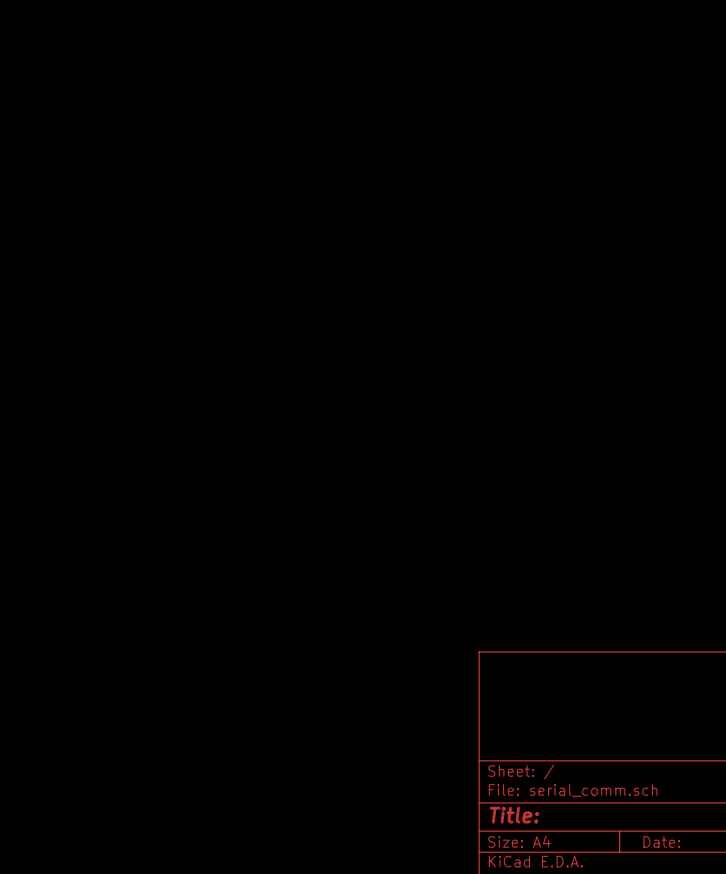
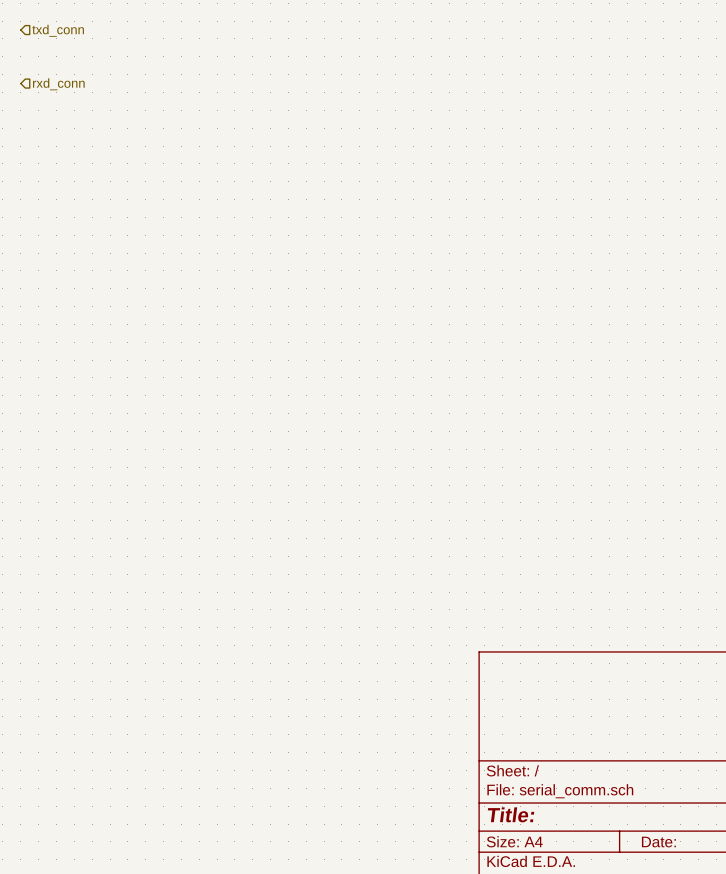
hierarchical label: none -> txd_conn (58, 30)
hierarchical label: none -> rxd_conn (58, 84)

